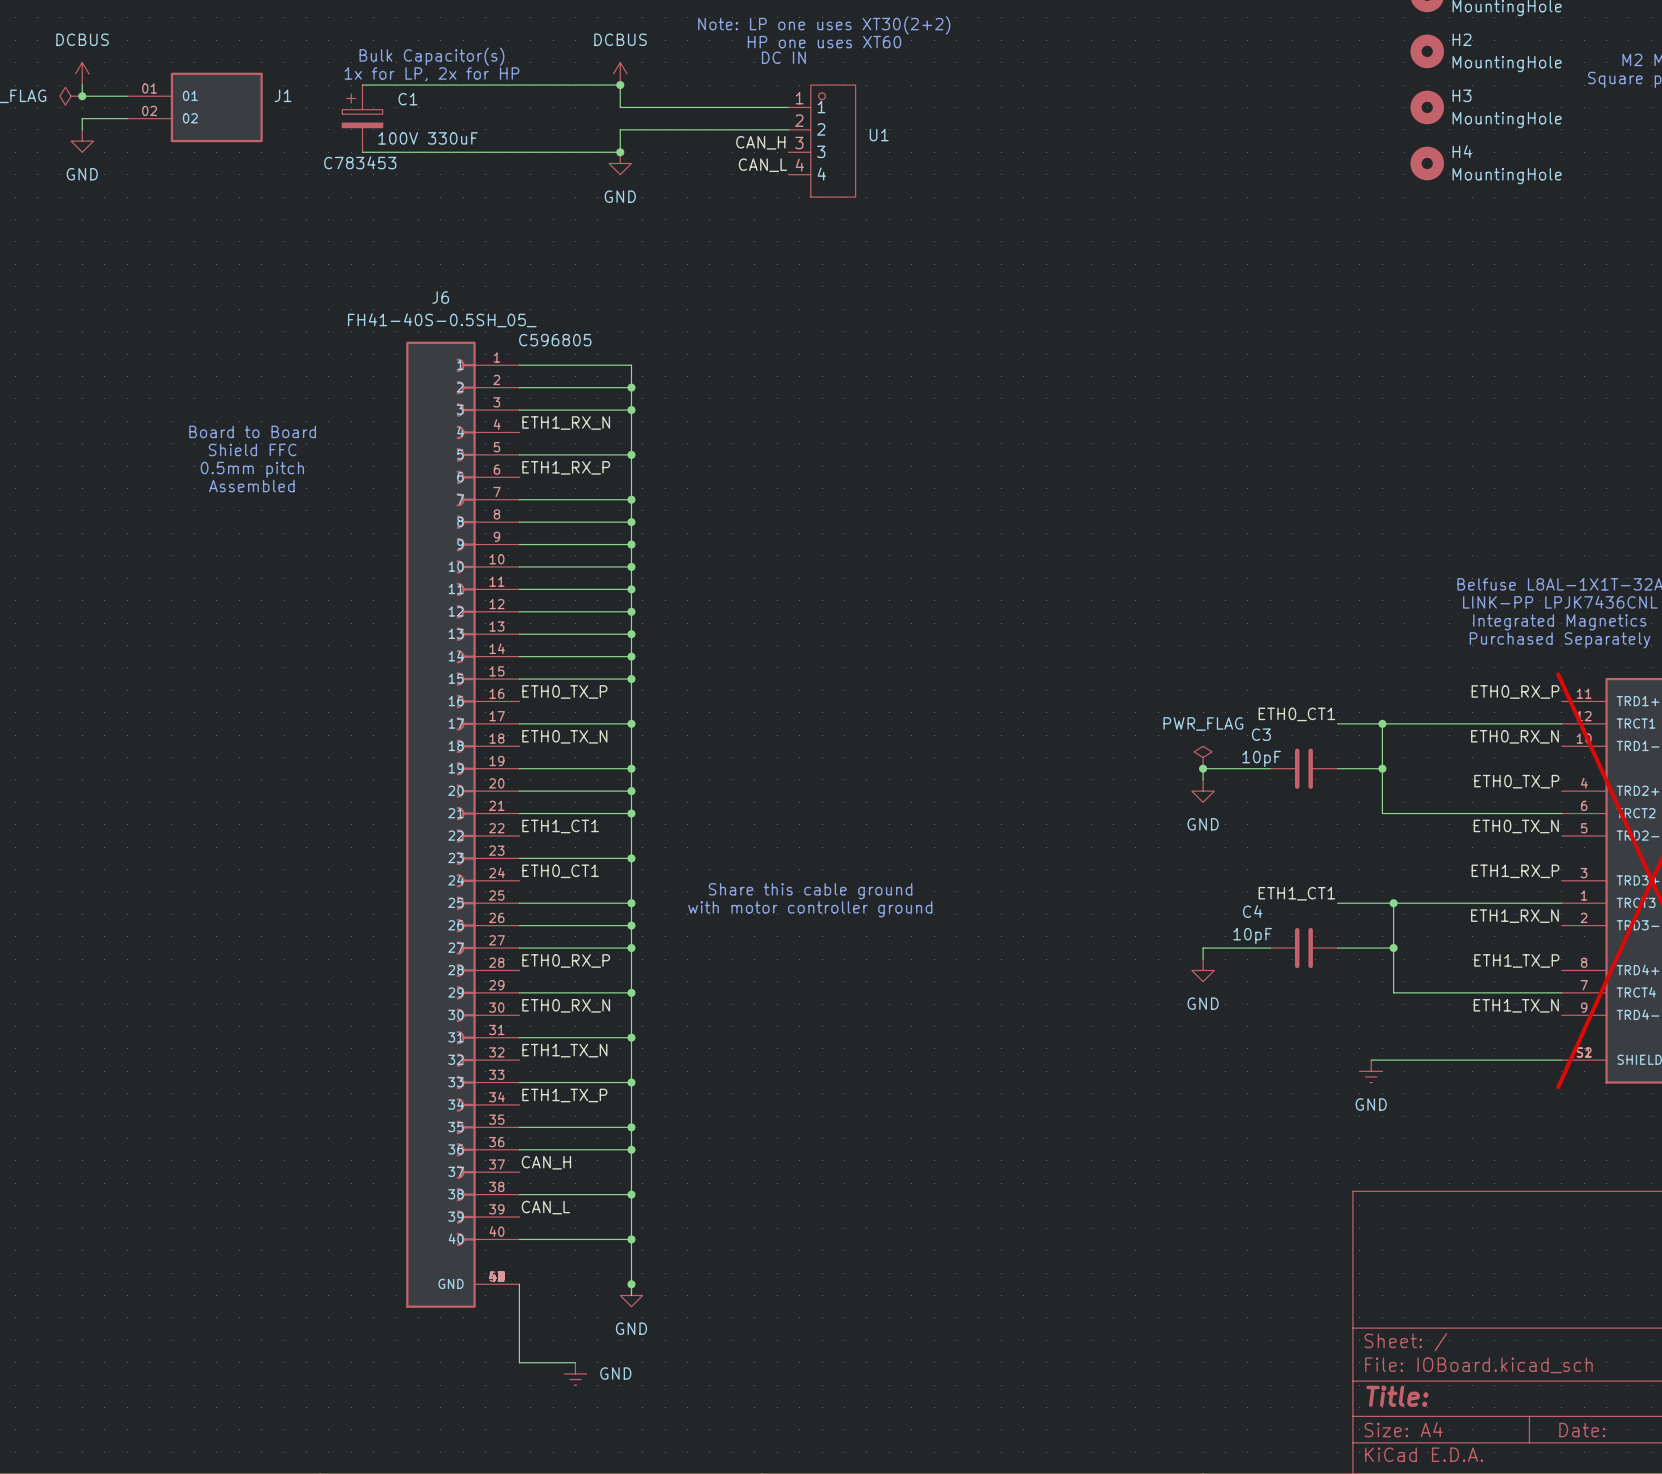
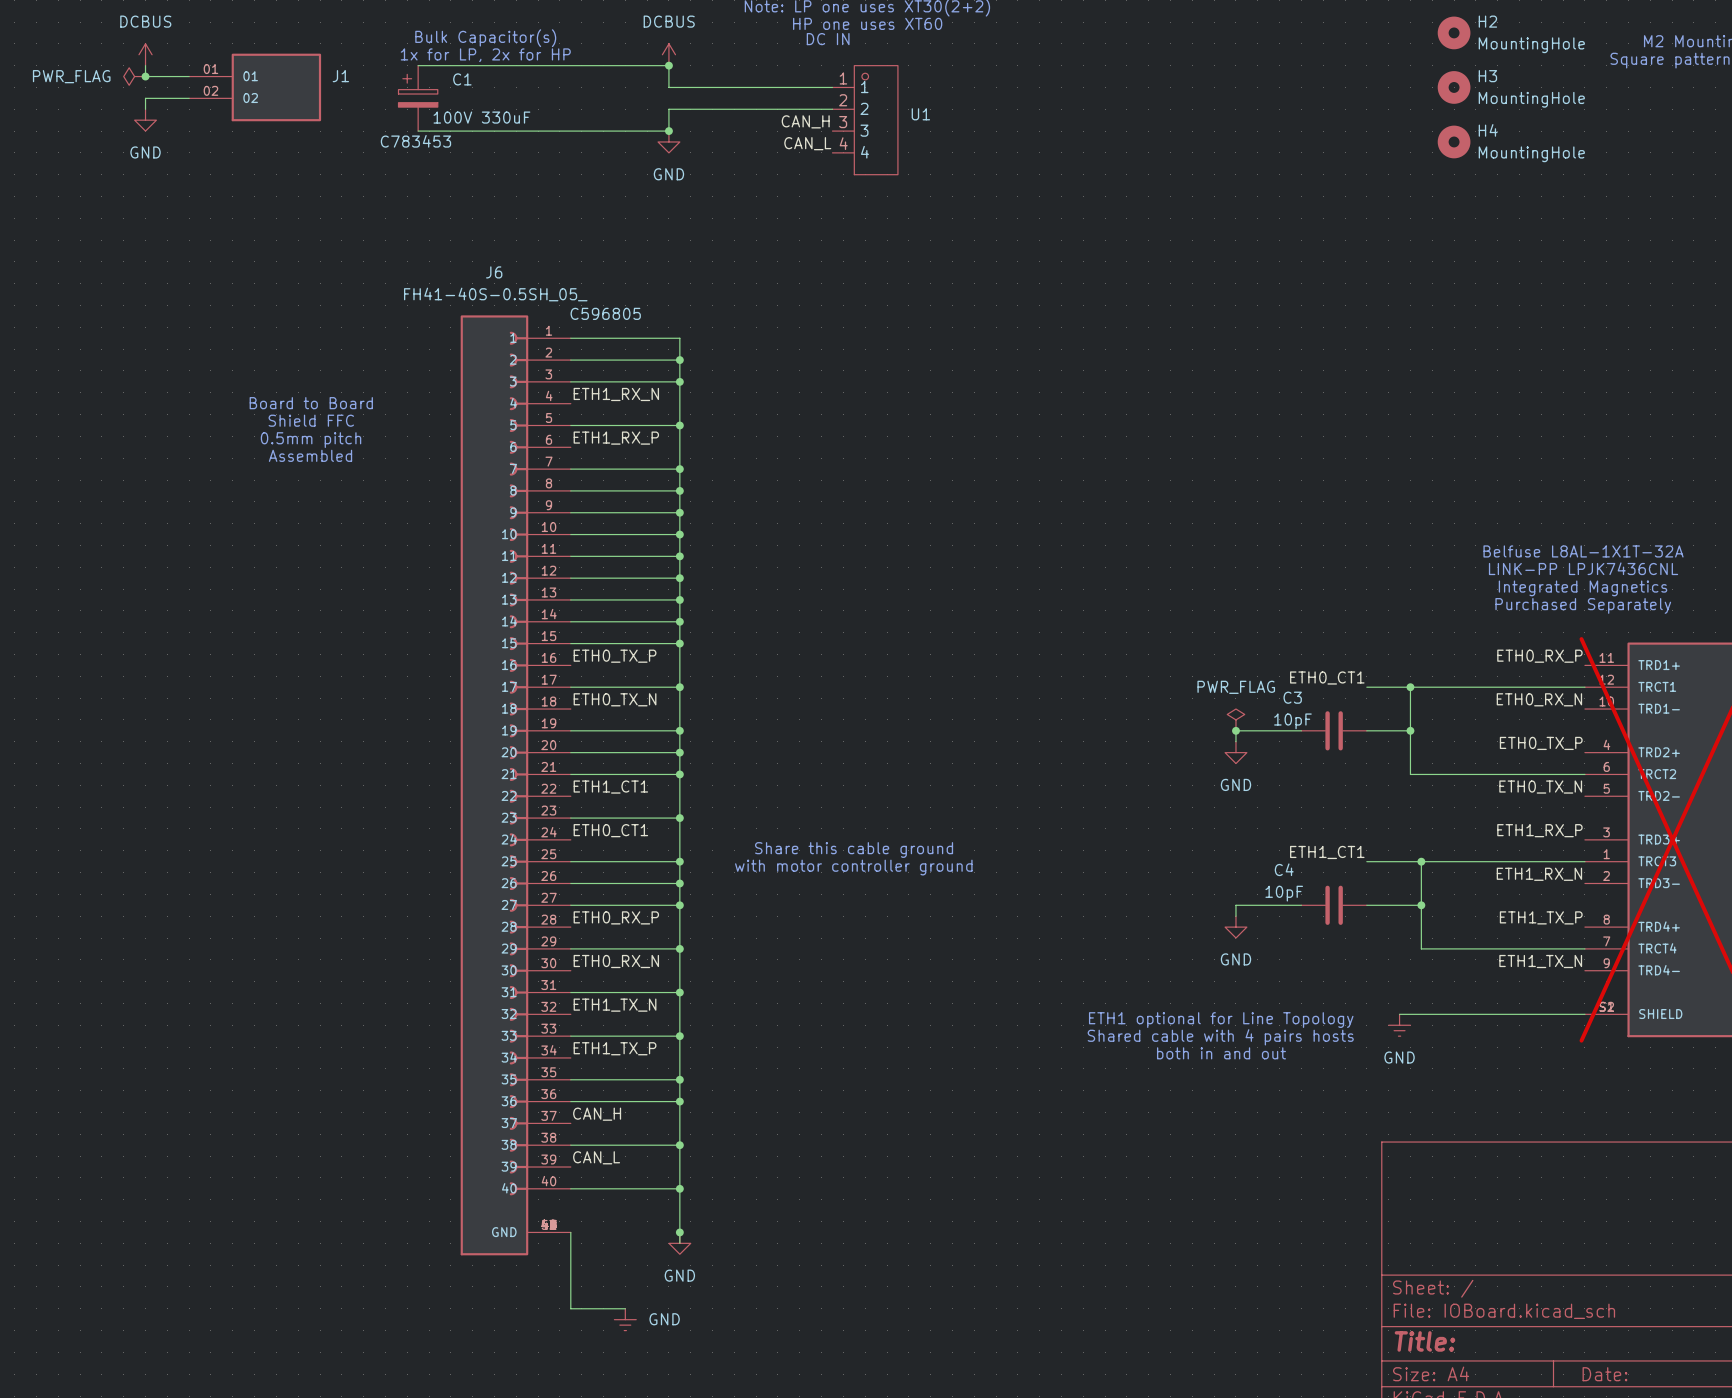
text: none -> ETH1 optional for Line Topology (1221, 1020)
text: none -> Shared cable with 4 pairs hosts (1220, 1037)
text: none -> both in and out (1221, 1053)

